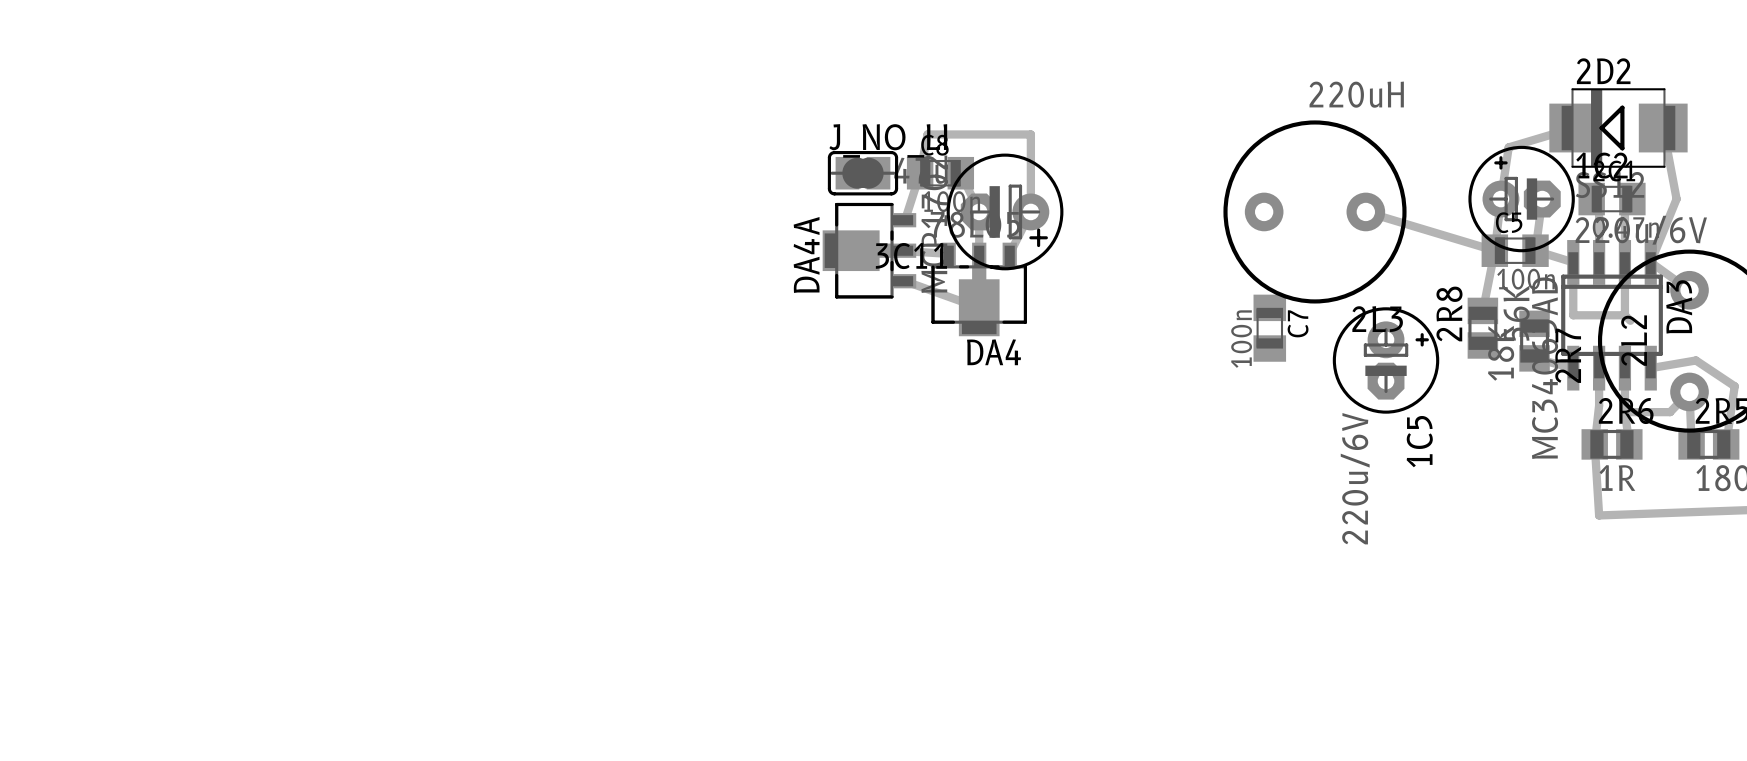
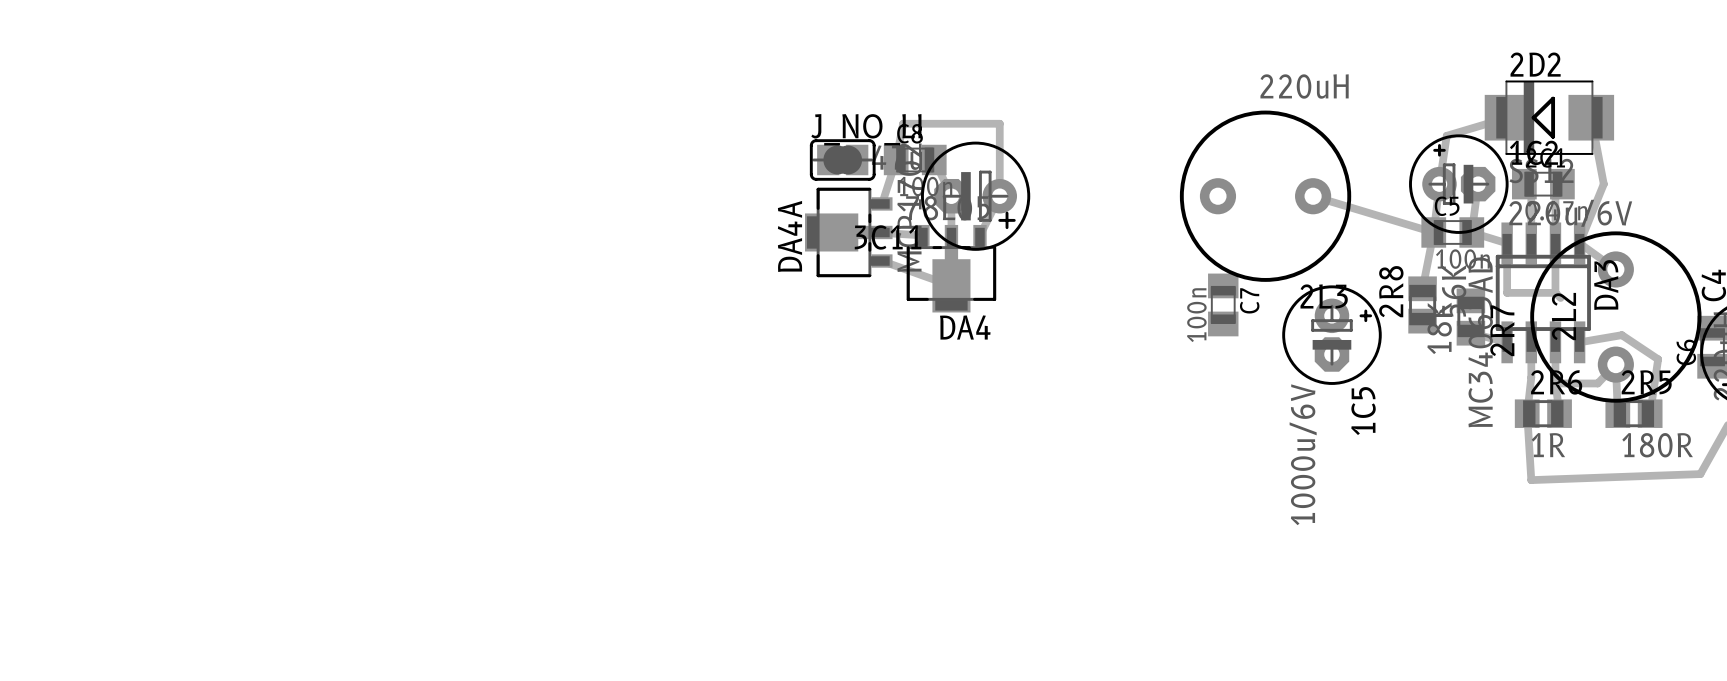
1C5 value: 220u/6V (1355, 478) -> 1000u/6V (1303, 454)

